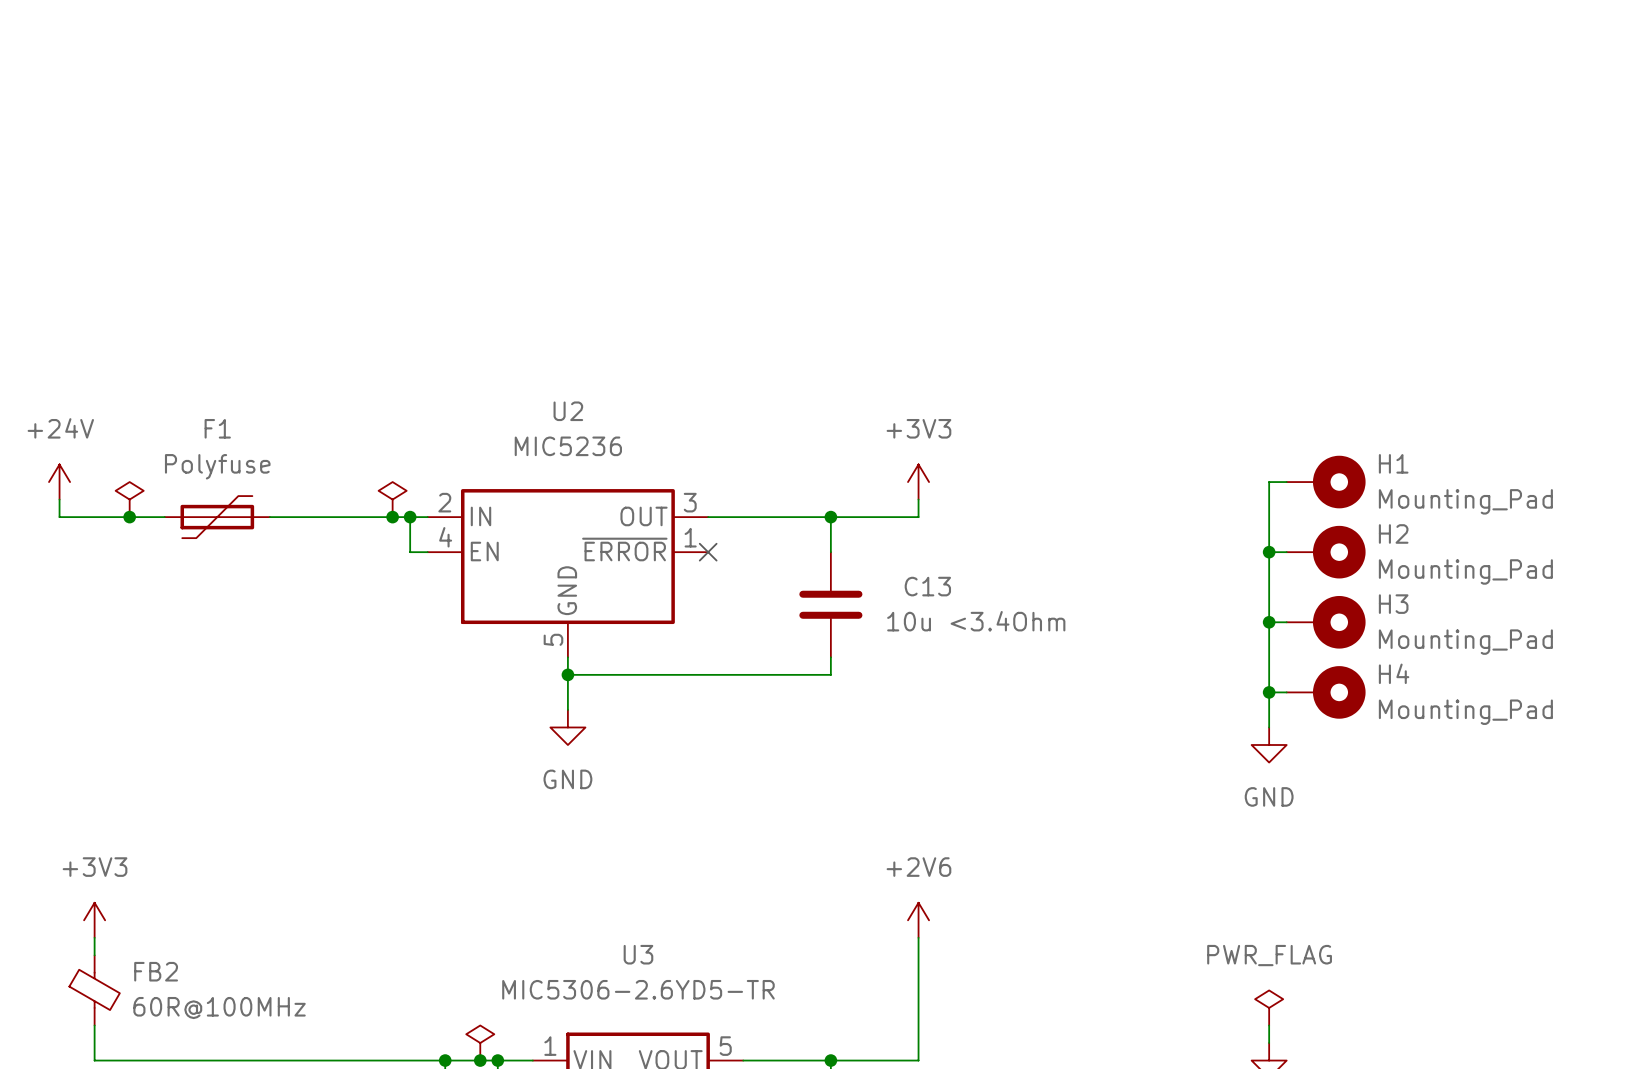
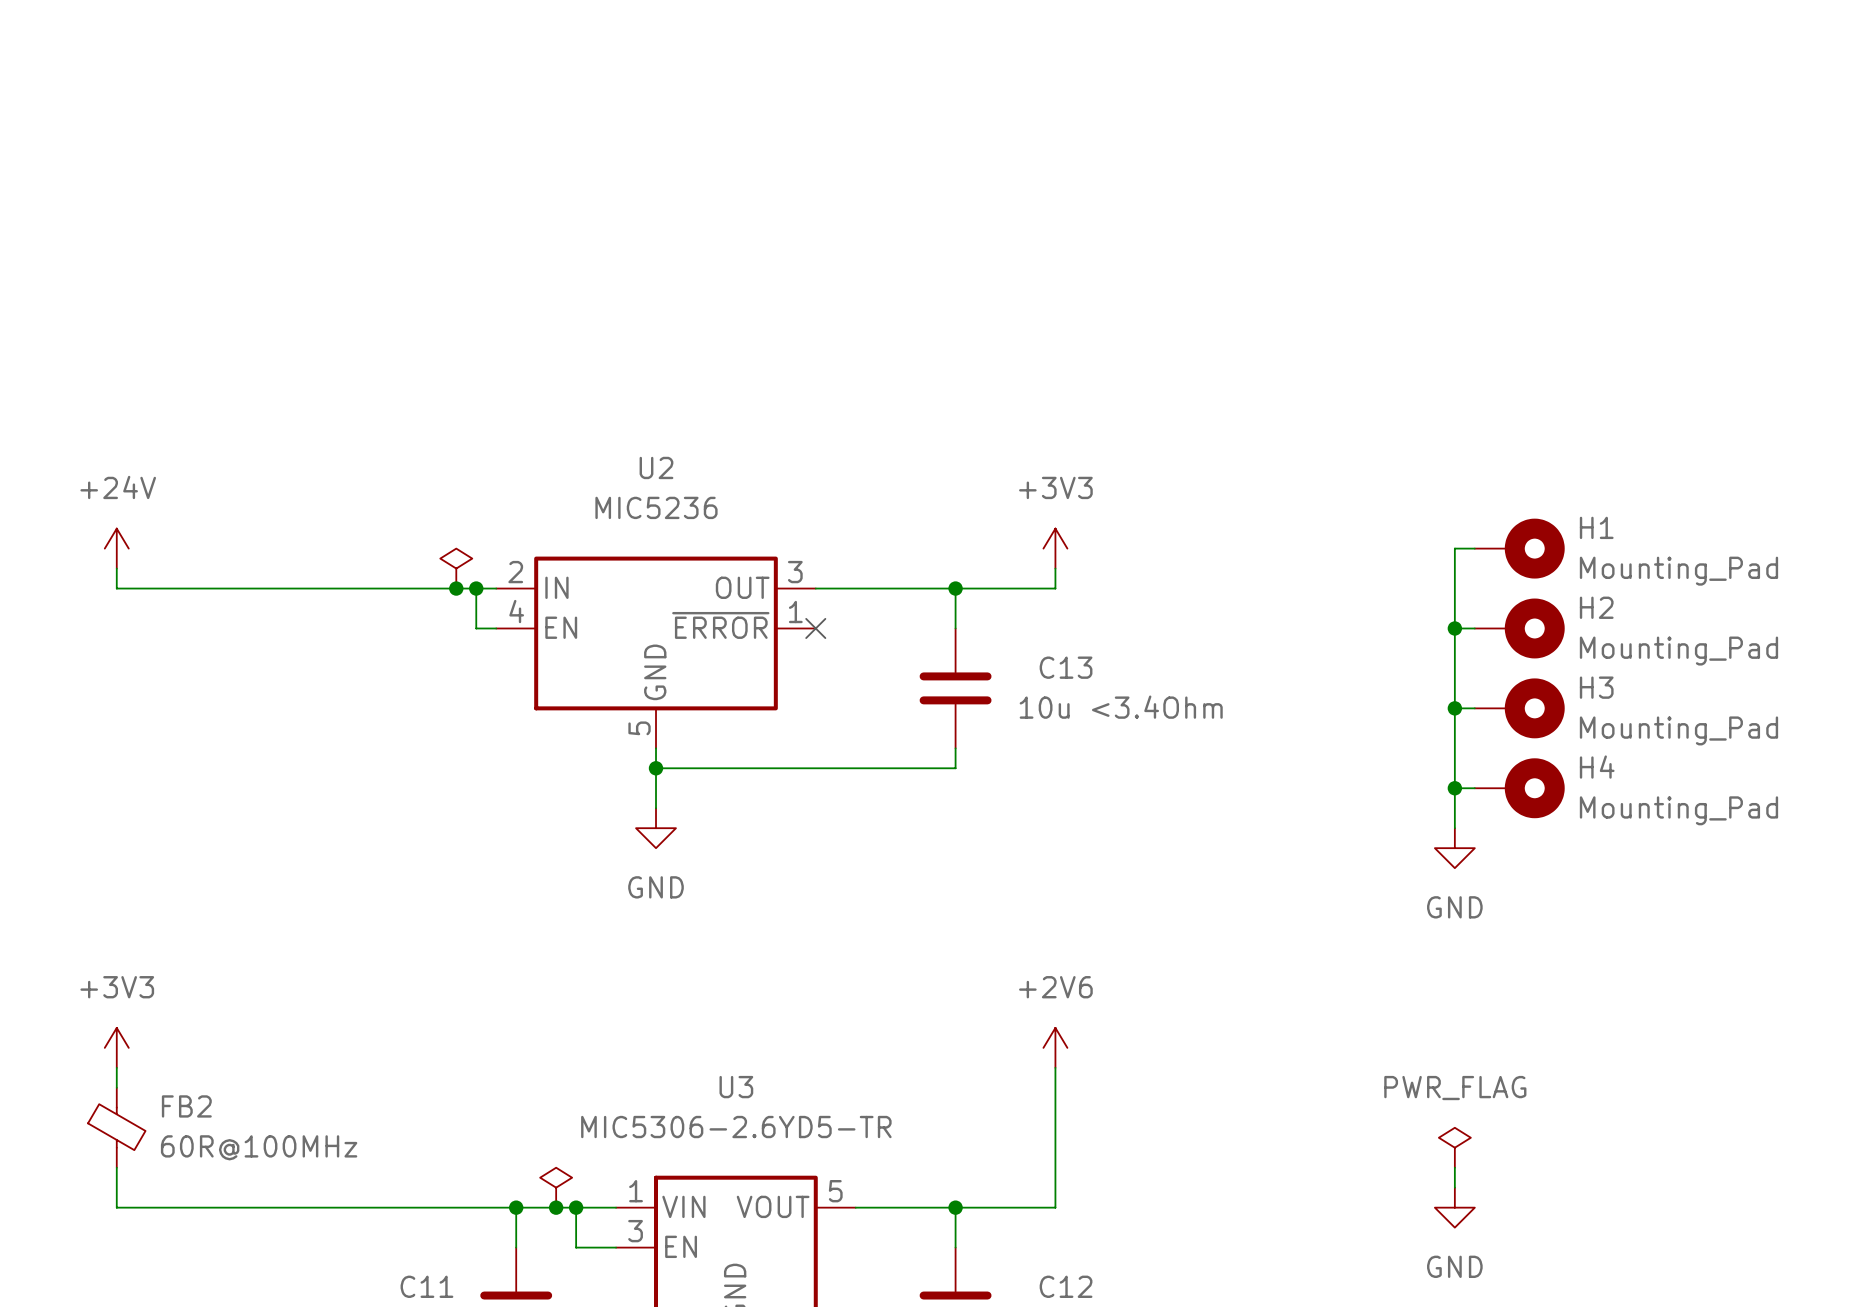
power symbol position: +24V (59, 482) -> +24V (116, 548)
wire: (59, 499) (59, 517) (94, 517) -> (116, 568) (116, 588)
power symbol: (129, 499) -> none
junction: (129, 517) -> none
F1: Polyfuse (217, 517) -> none

